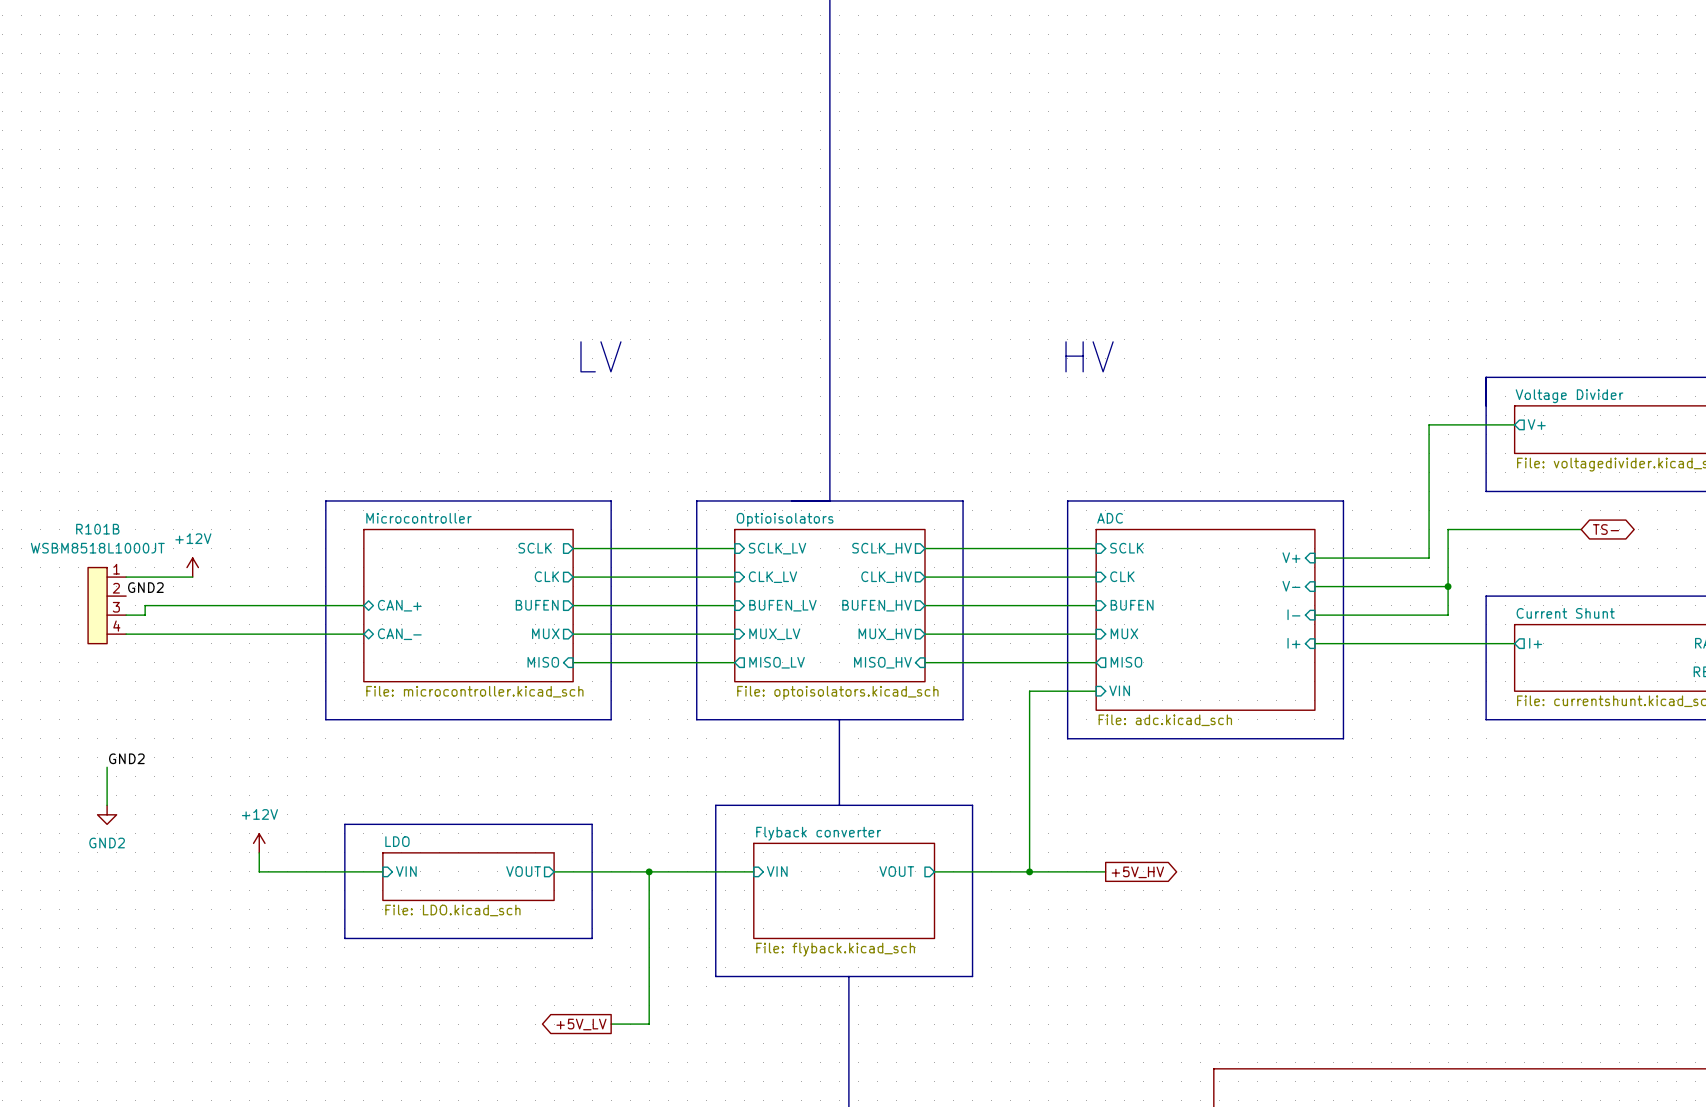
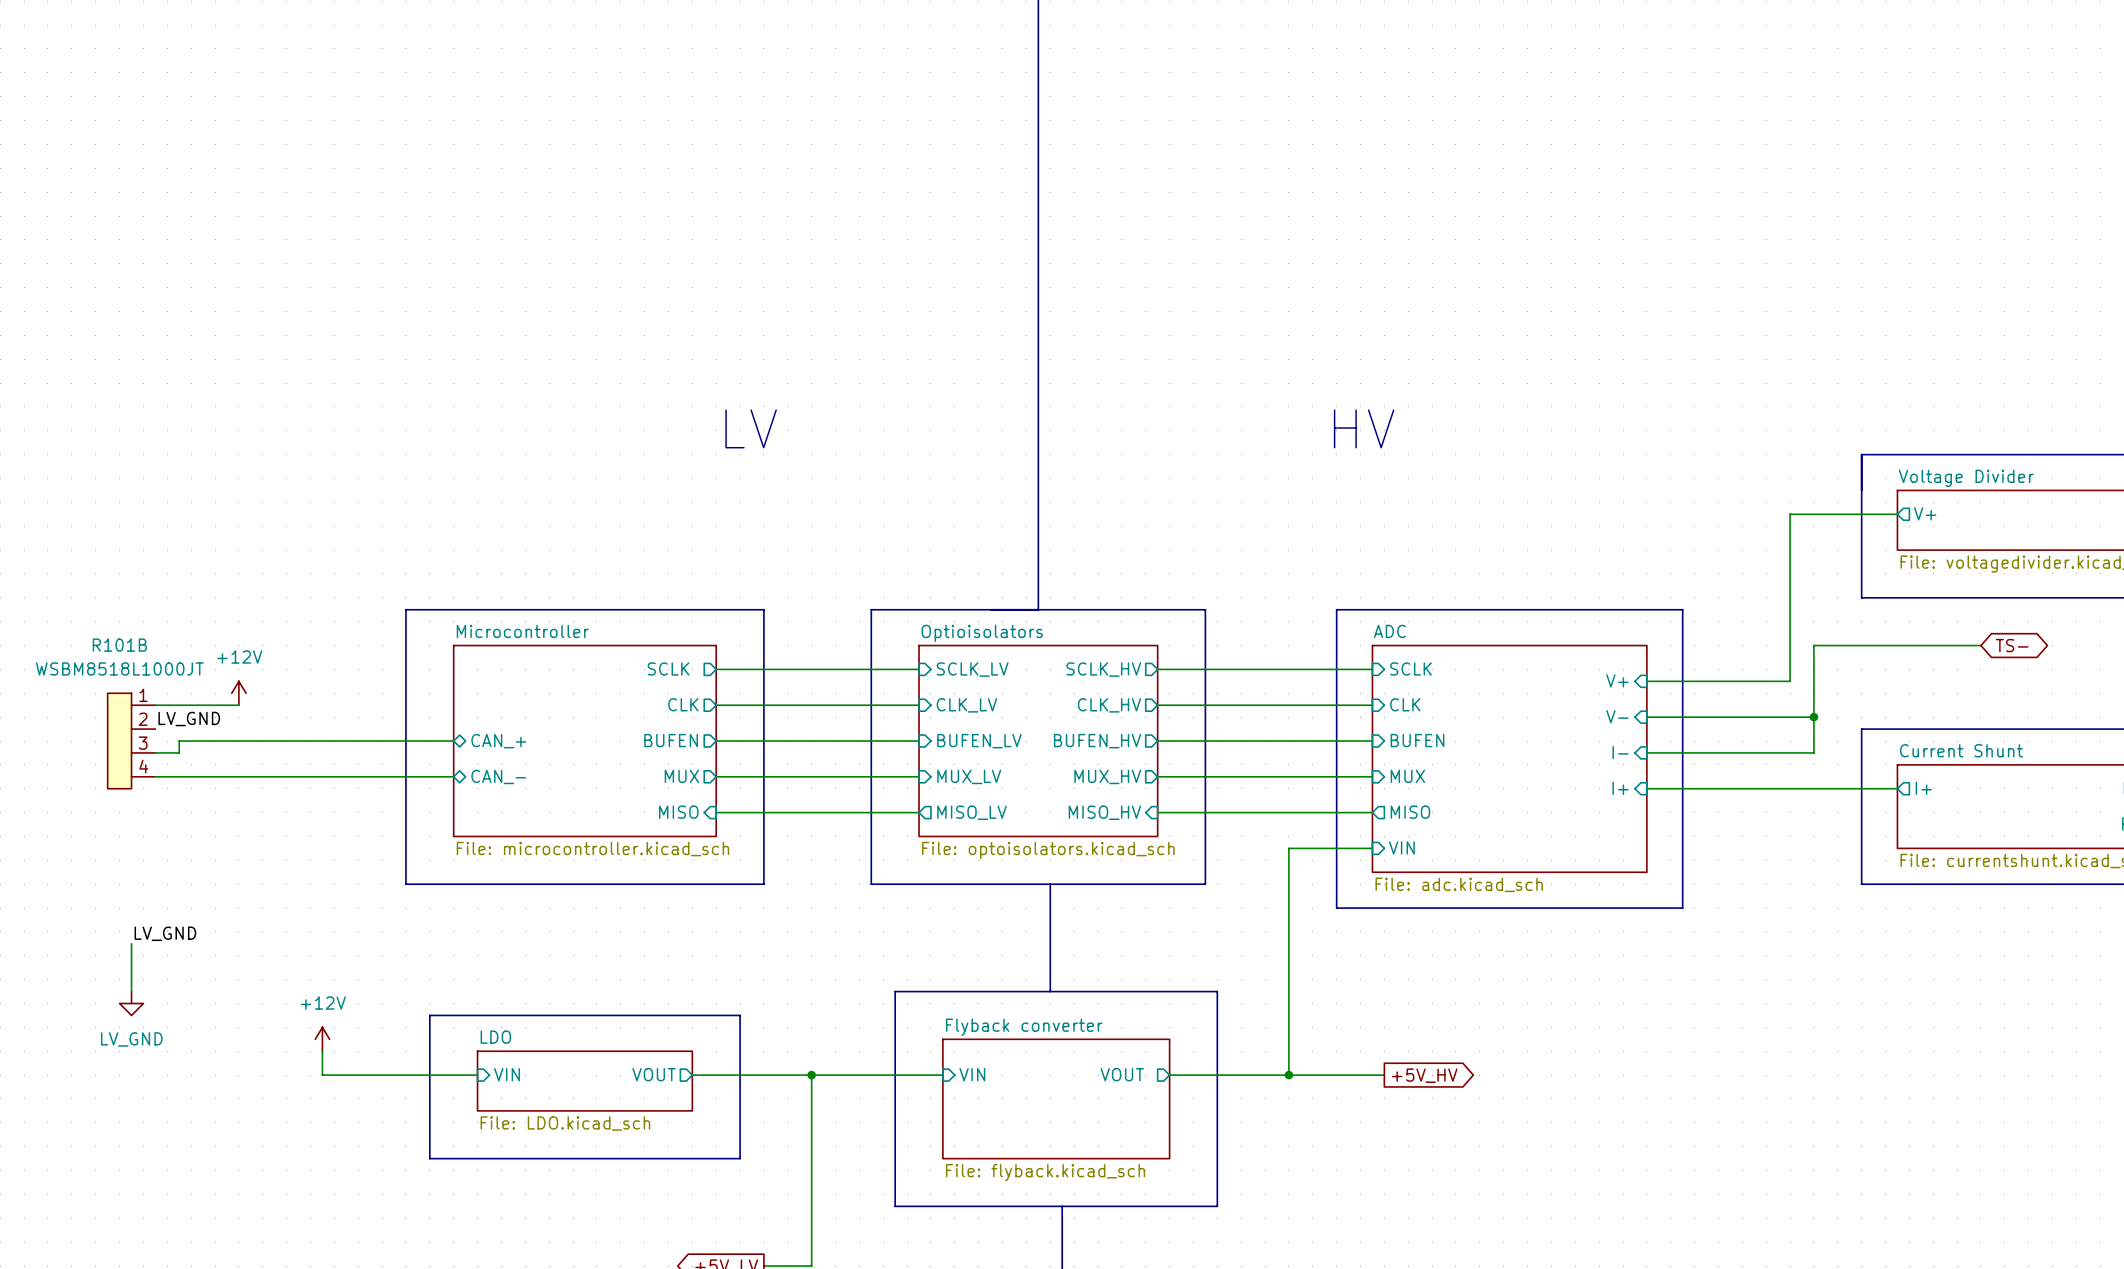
label: GND2 (145, 587) -> LV_GND (189, 719)
label: GND2 (126, 758) -> LV_GND (165, 933)
power symbol: GND2 (107, 814) -> LV_GND (131, 1003)

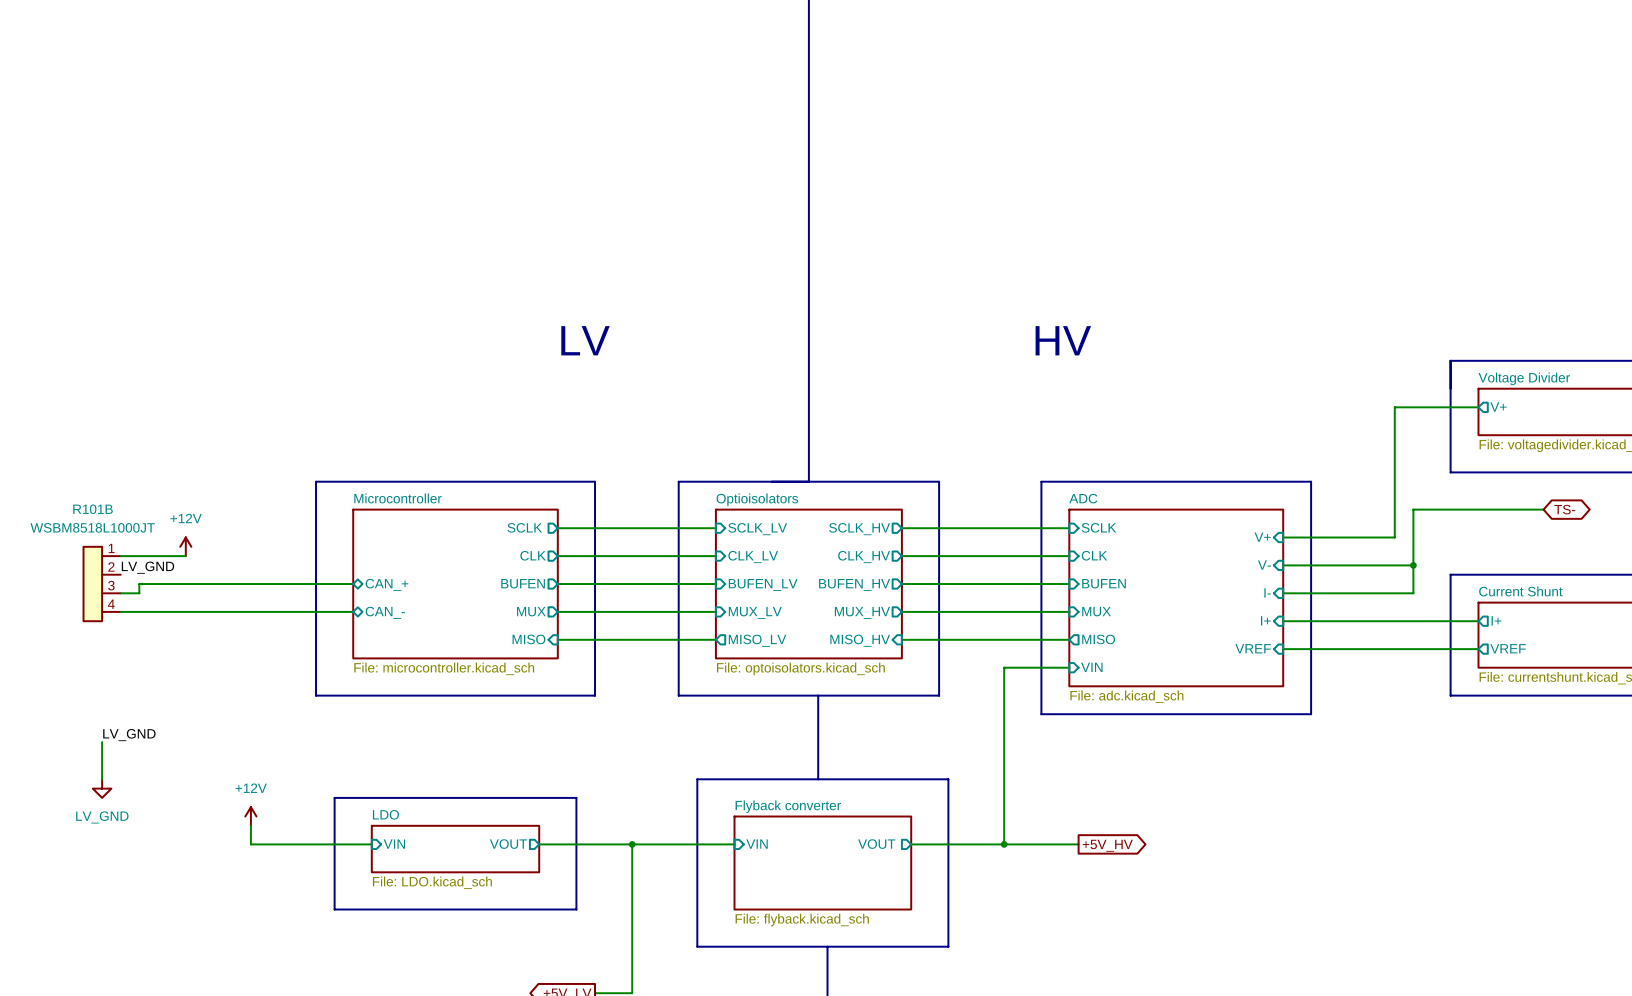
sheet pin: none -> VREF (1253, 648)
wire: none -> (1283, 649) (1478, 649)
sheet pin: none -> VREF (1508, 648)

